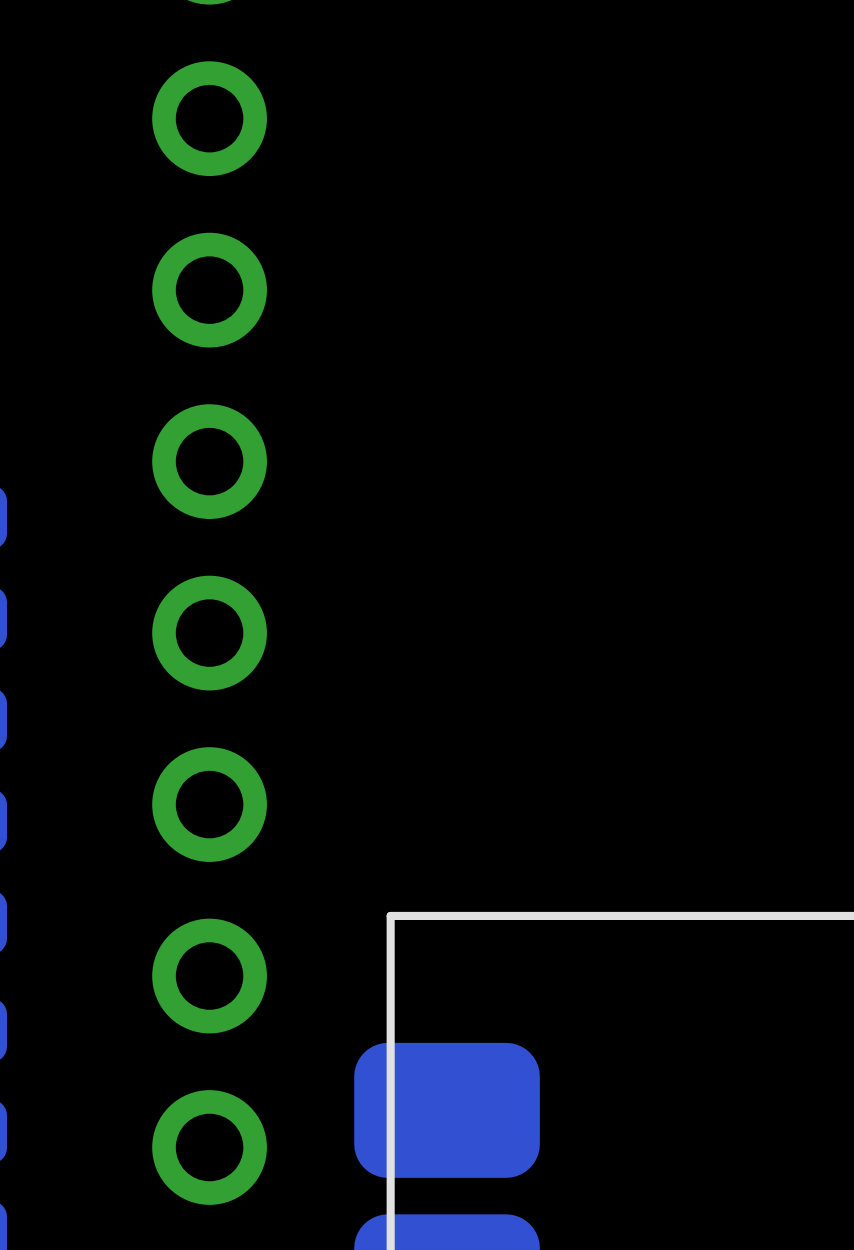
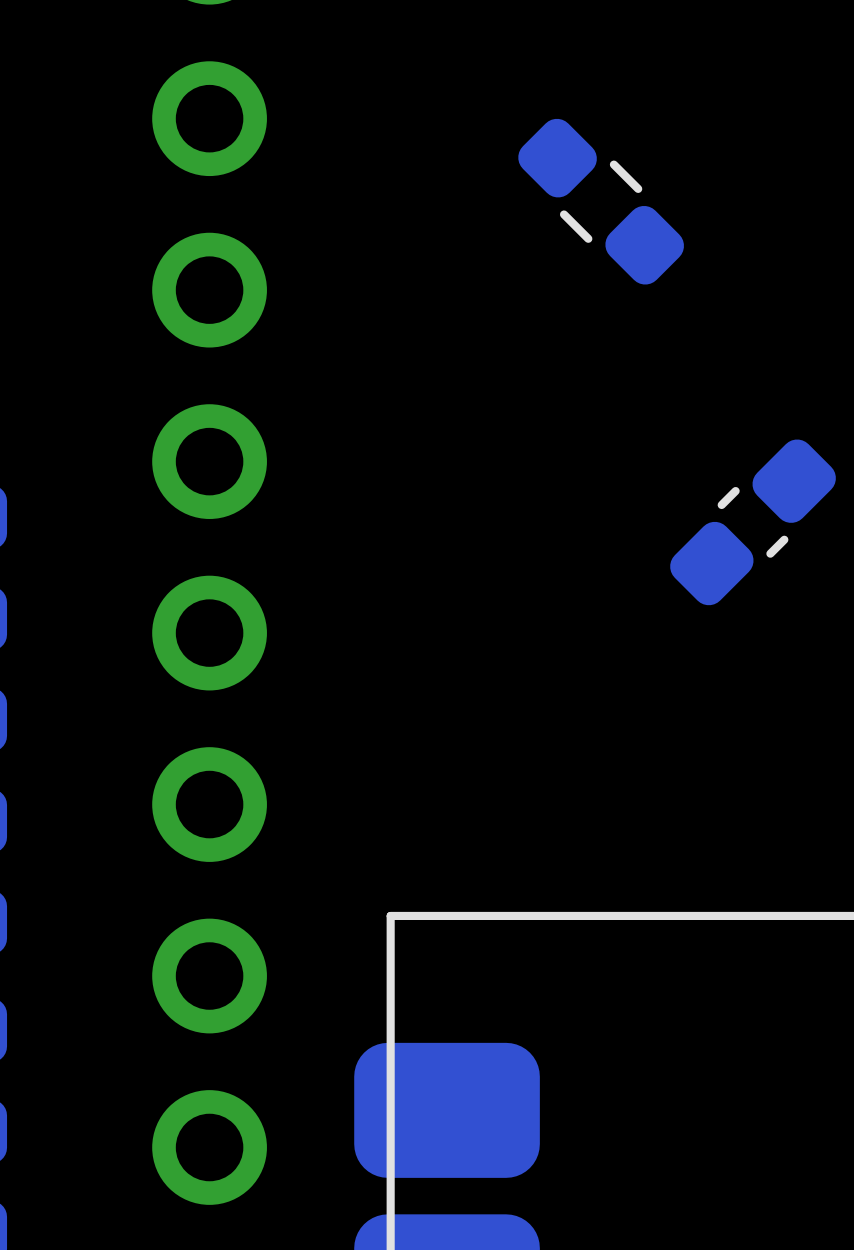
part: none -> (601, 201)
part: none -> (753, 522)

